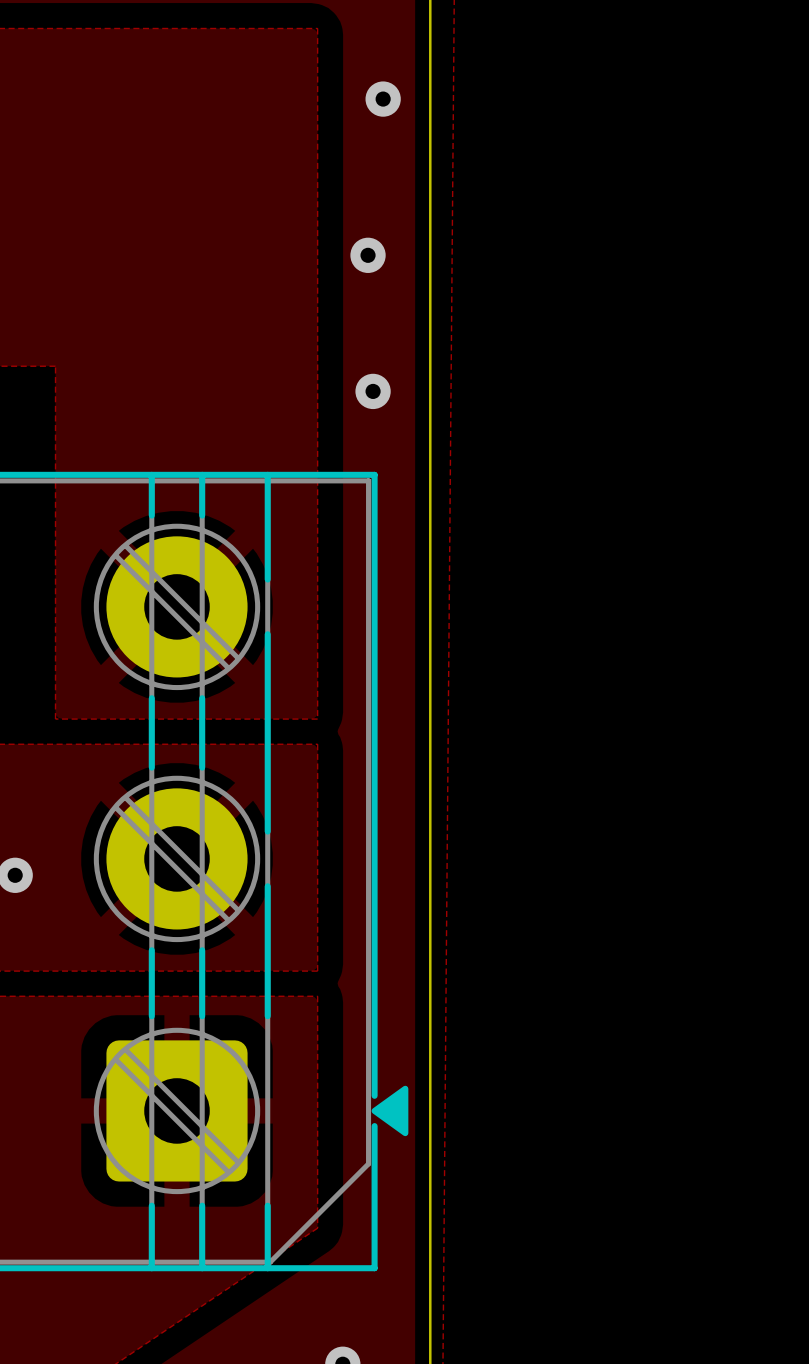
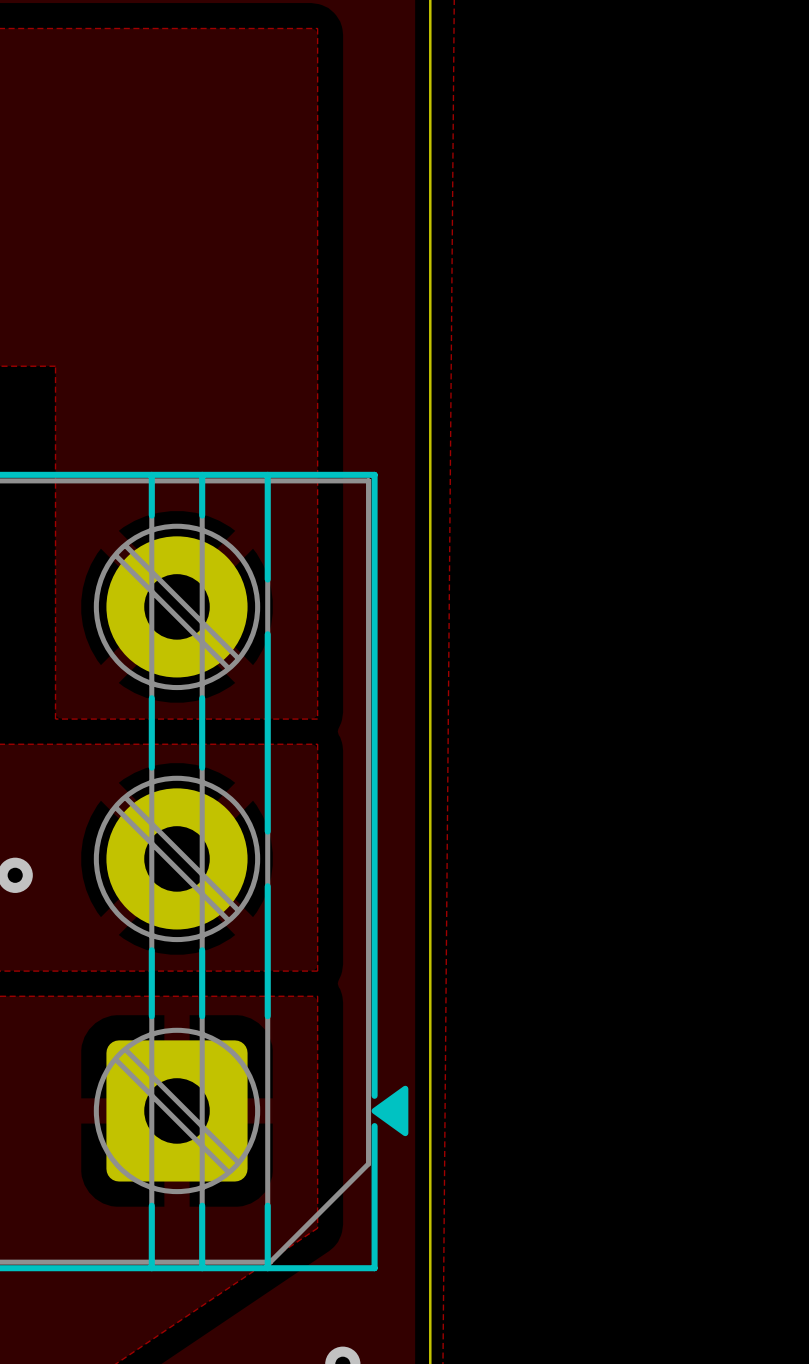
via: (383, 99) -> none
via: (368, 255) -> none
via: (373, 391) -> none

